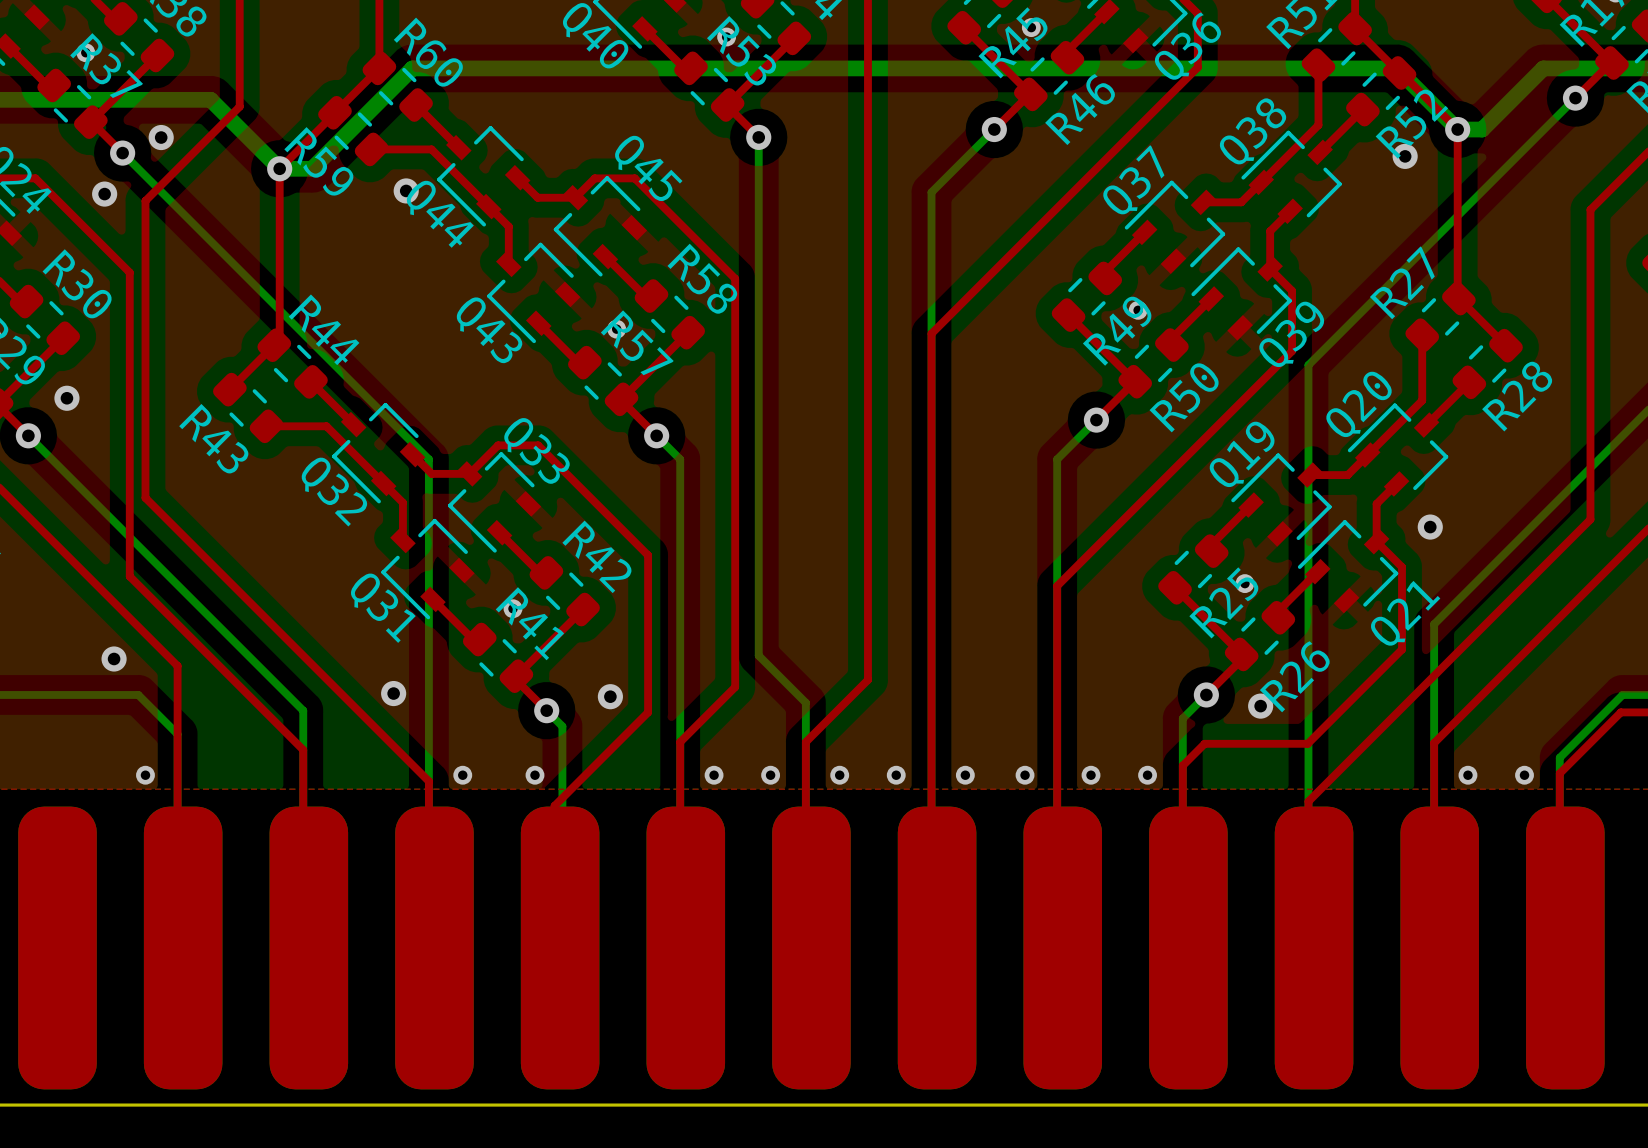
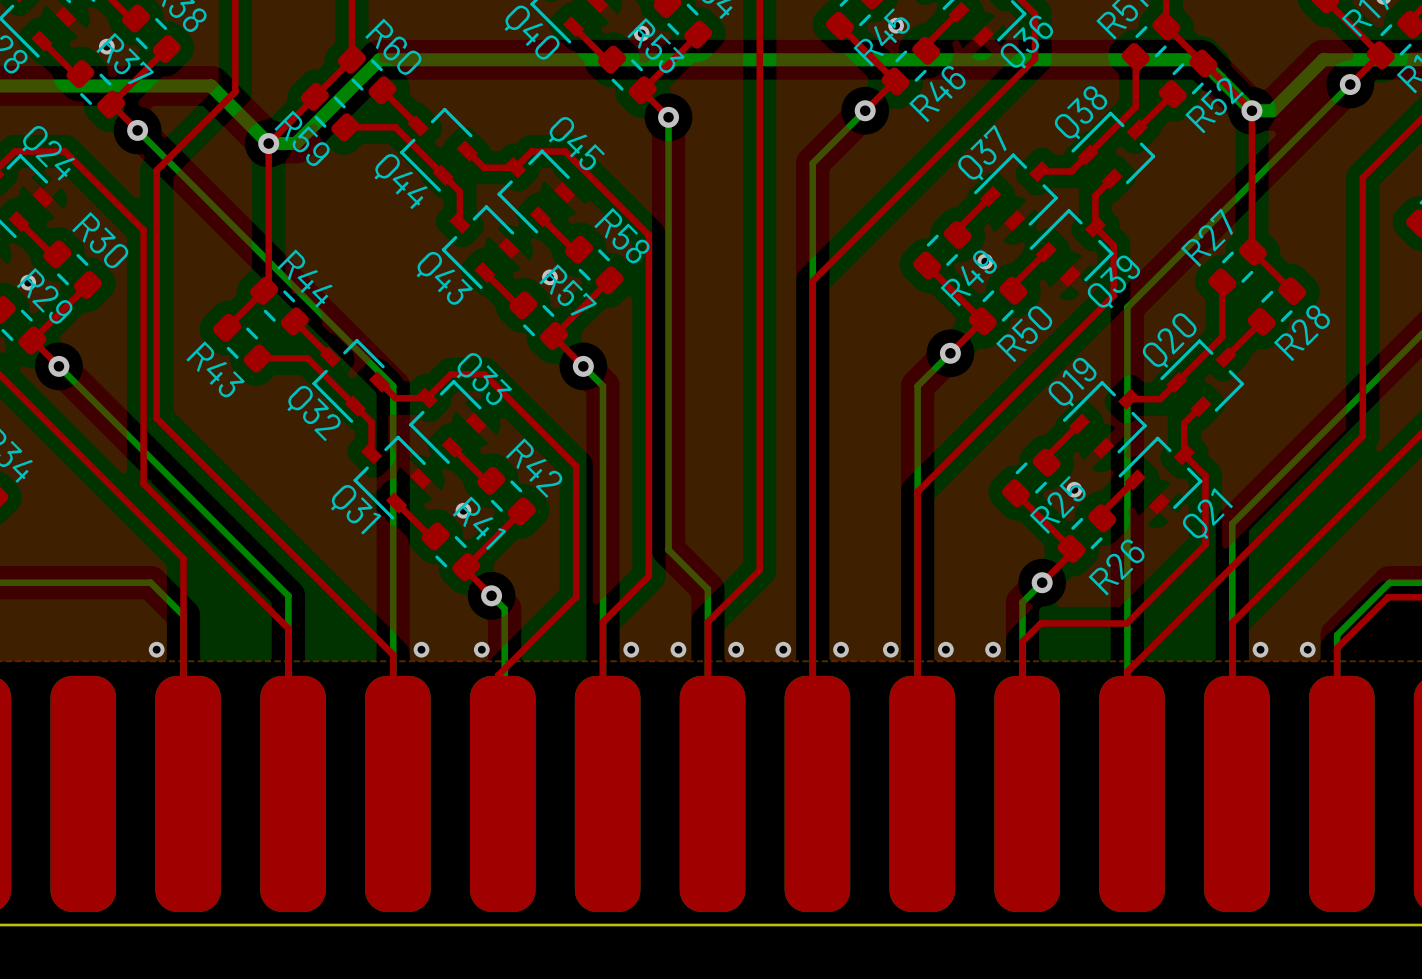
via: (161, 137) -> none
via: (1405, 156) -> none
via: (406, 190) -> none
via: (104, 194) -> none
via: (66, 398) -> none
via: (1430, 527) -> none
via: (114, 658) -> none
via: (393, 693) -> none
via: (610, 696) -> none
via: (1260, 706) -> none

